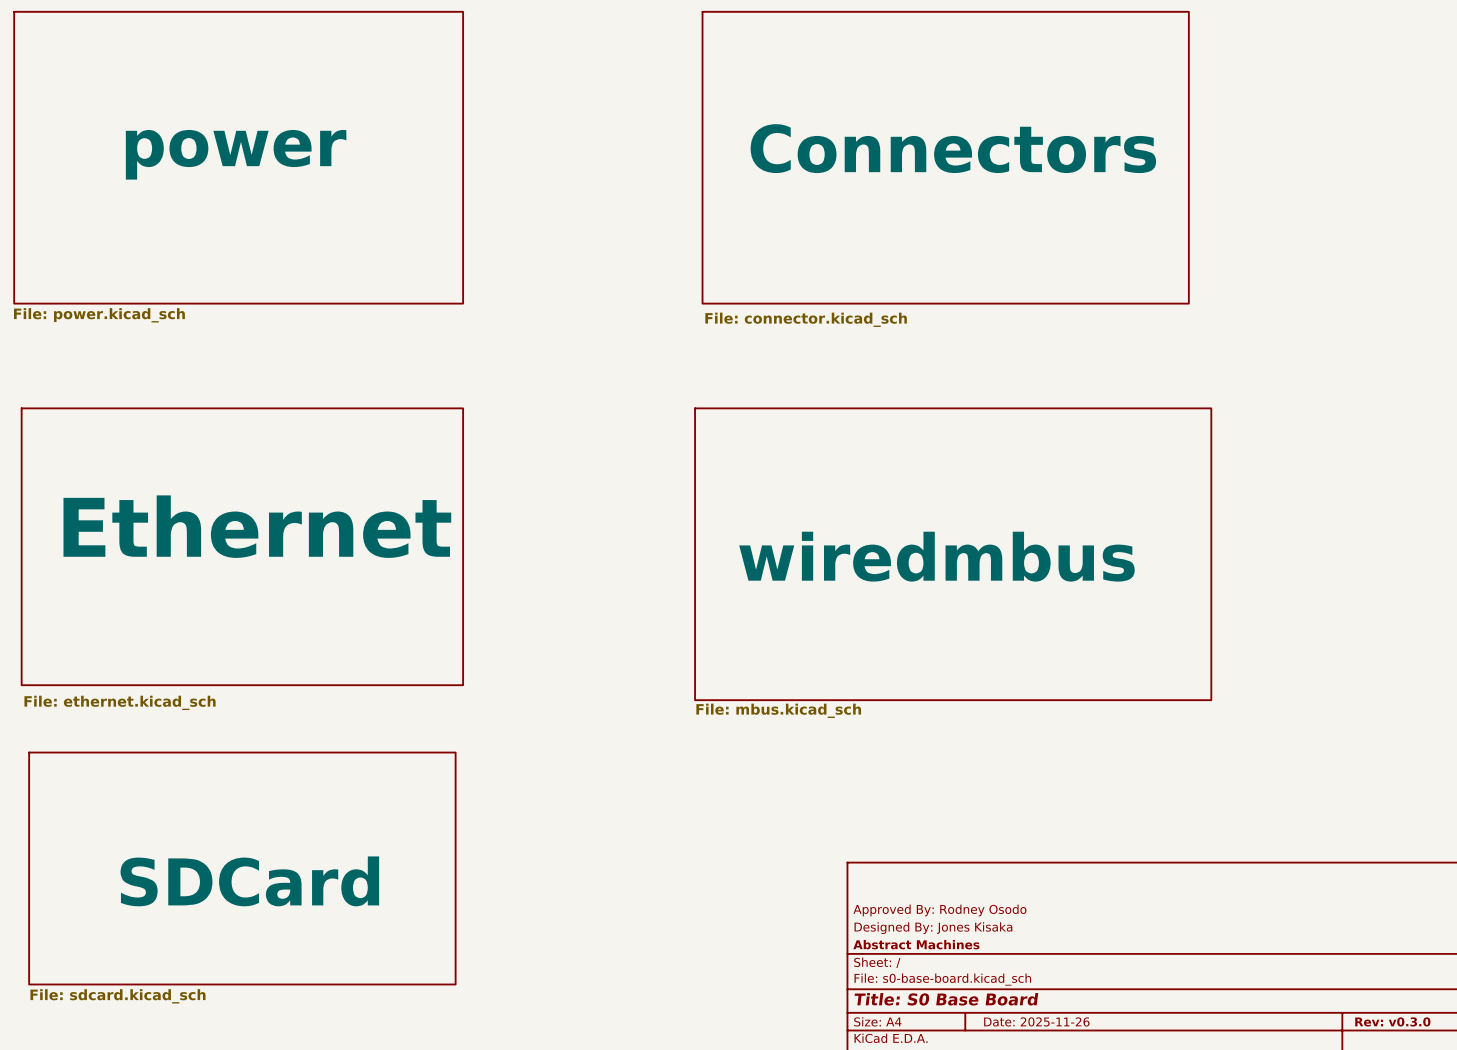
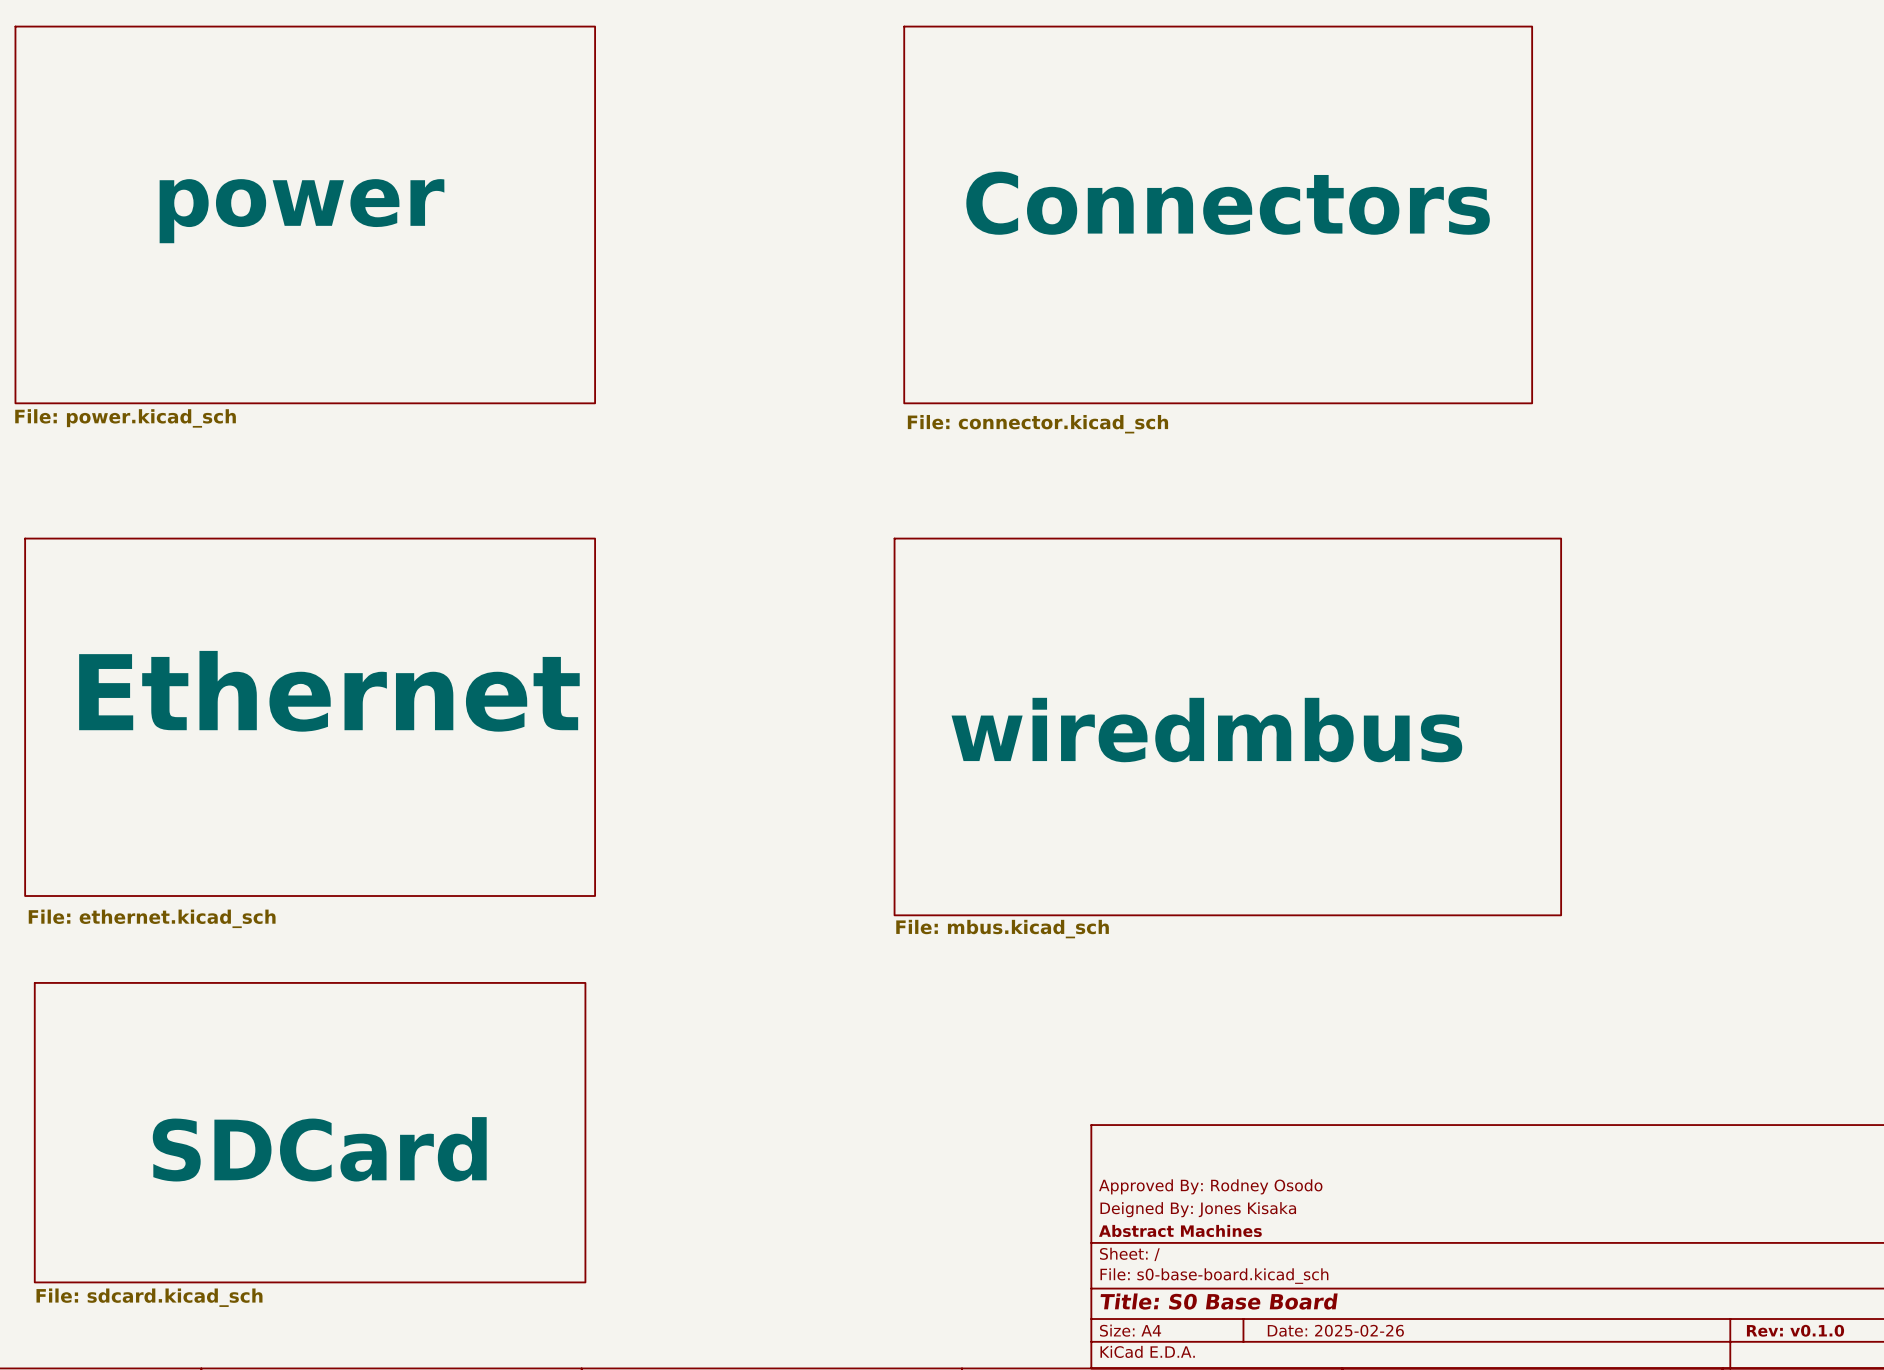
title block: Designed By: Jones Kisaka (933, 928) -> Deigned By: Jones Kisaka (1198, 1209)
title block: Date: 2025-11-26 (1036, 1021) -> Date: 2025-02-26 (1335, 1330)
title block: Rev: v0.3.0 (1392, 1021) -> Rev: v0.1.0 (1795, 1330)

